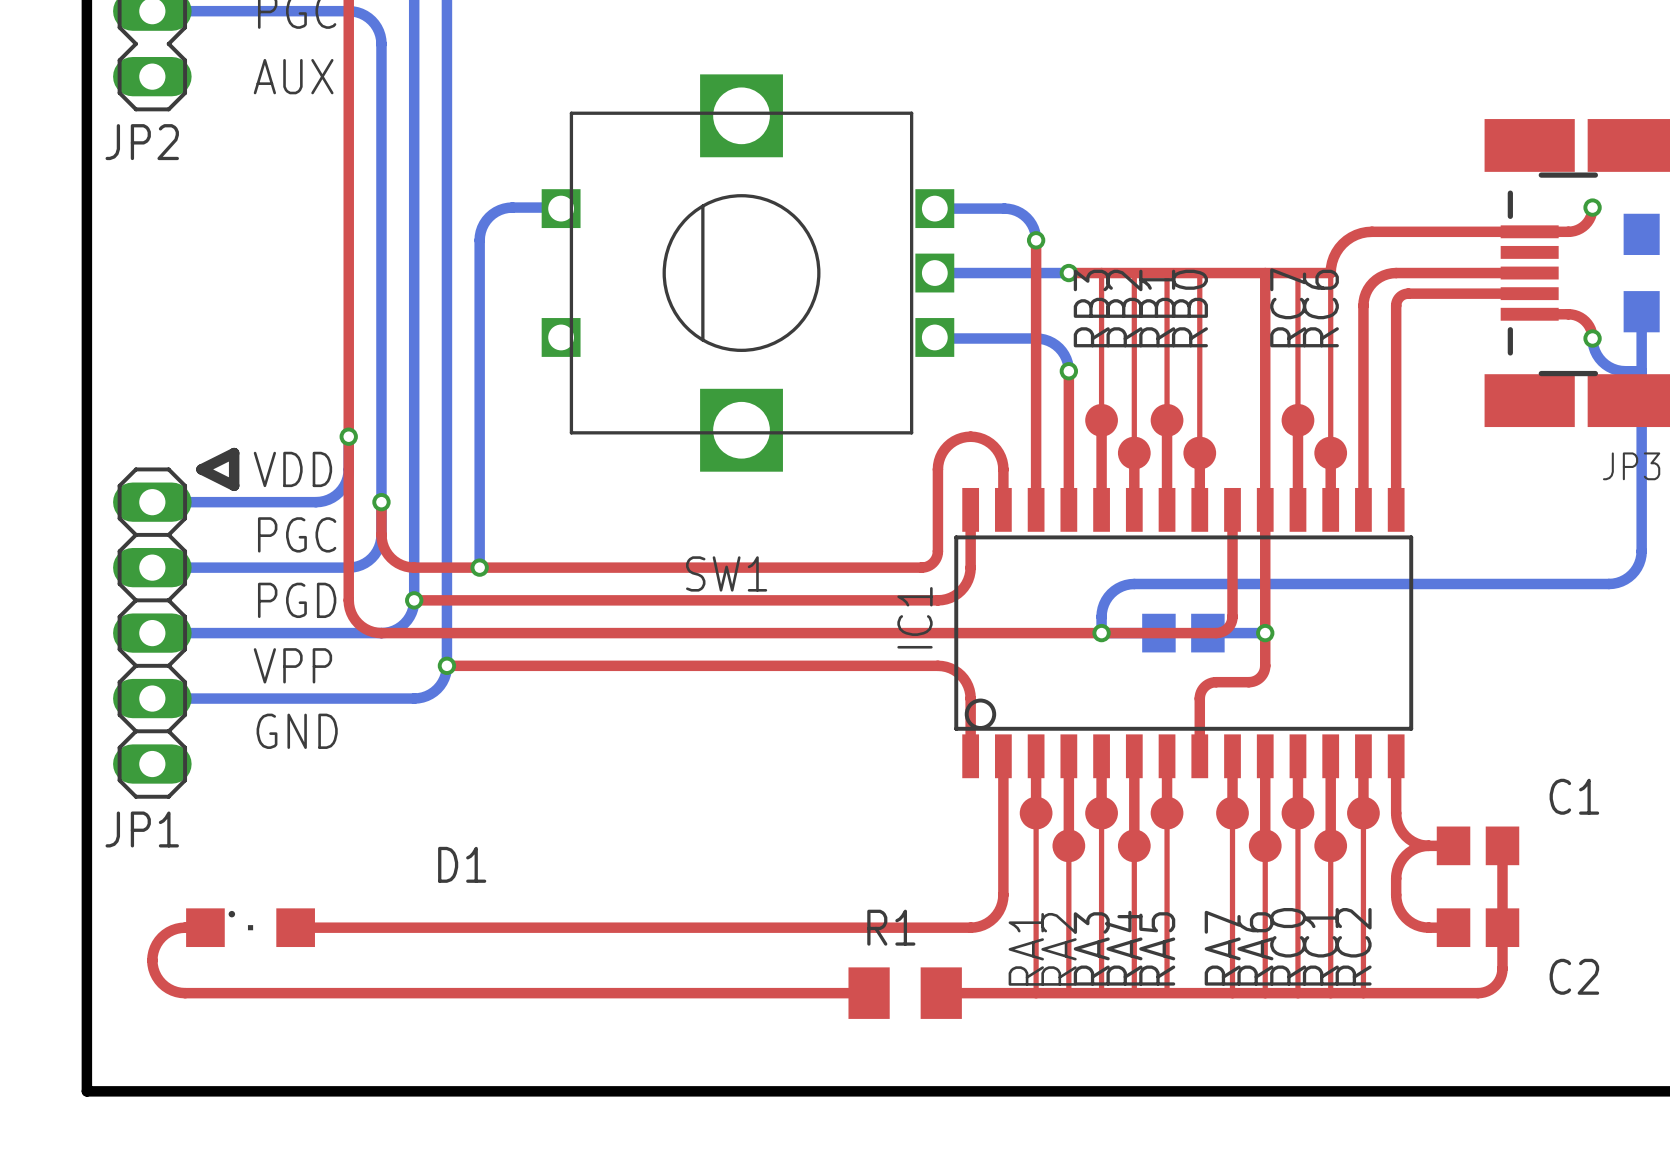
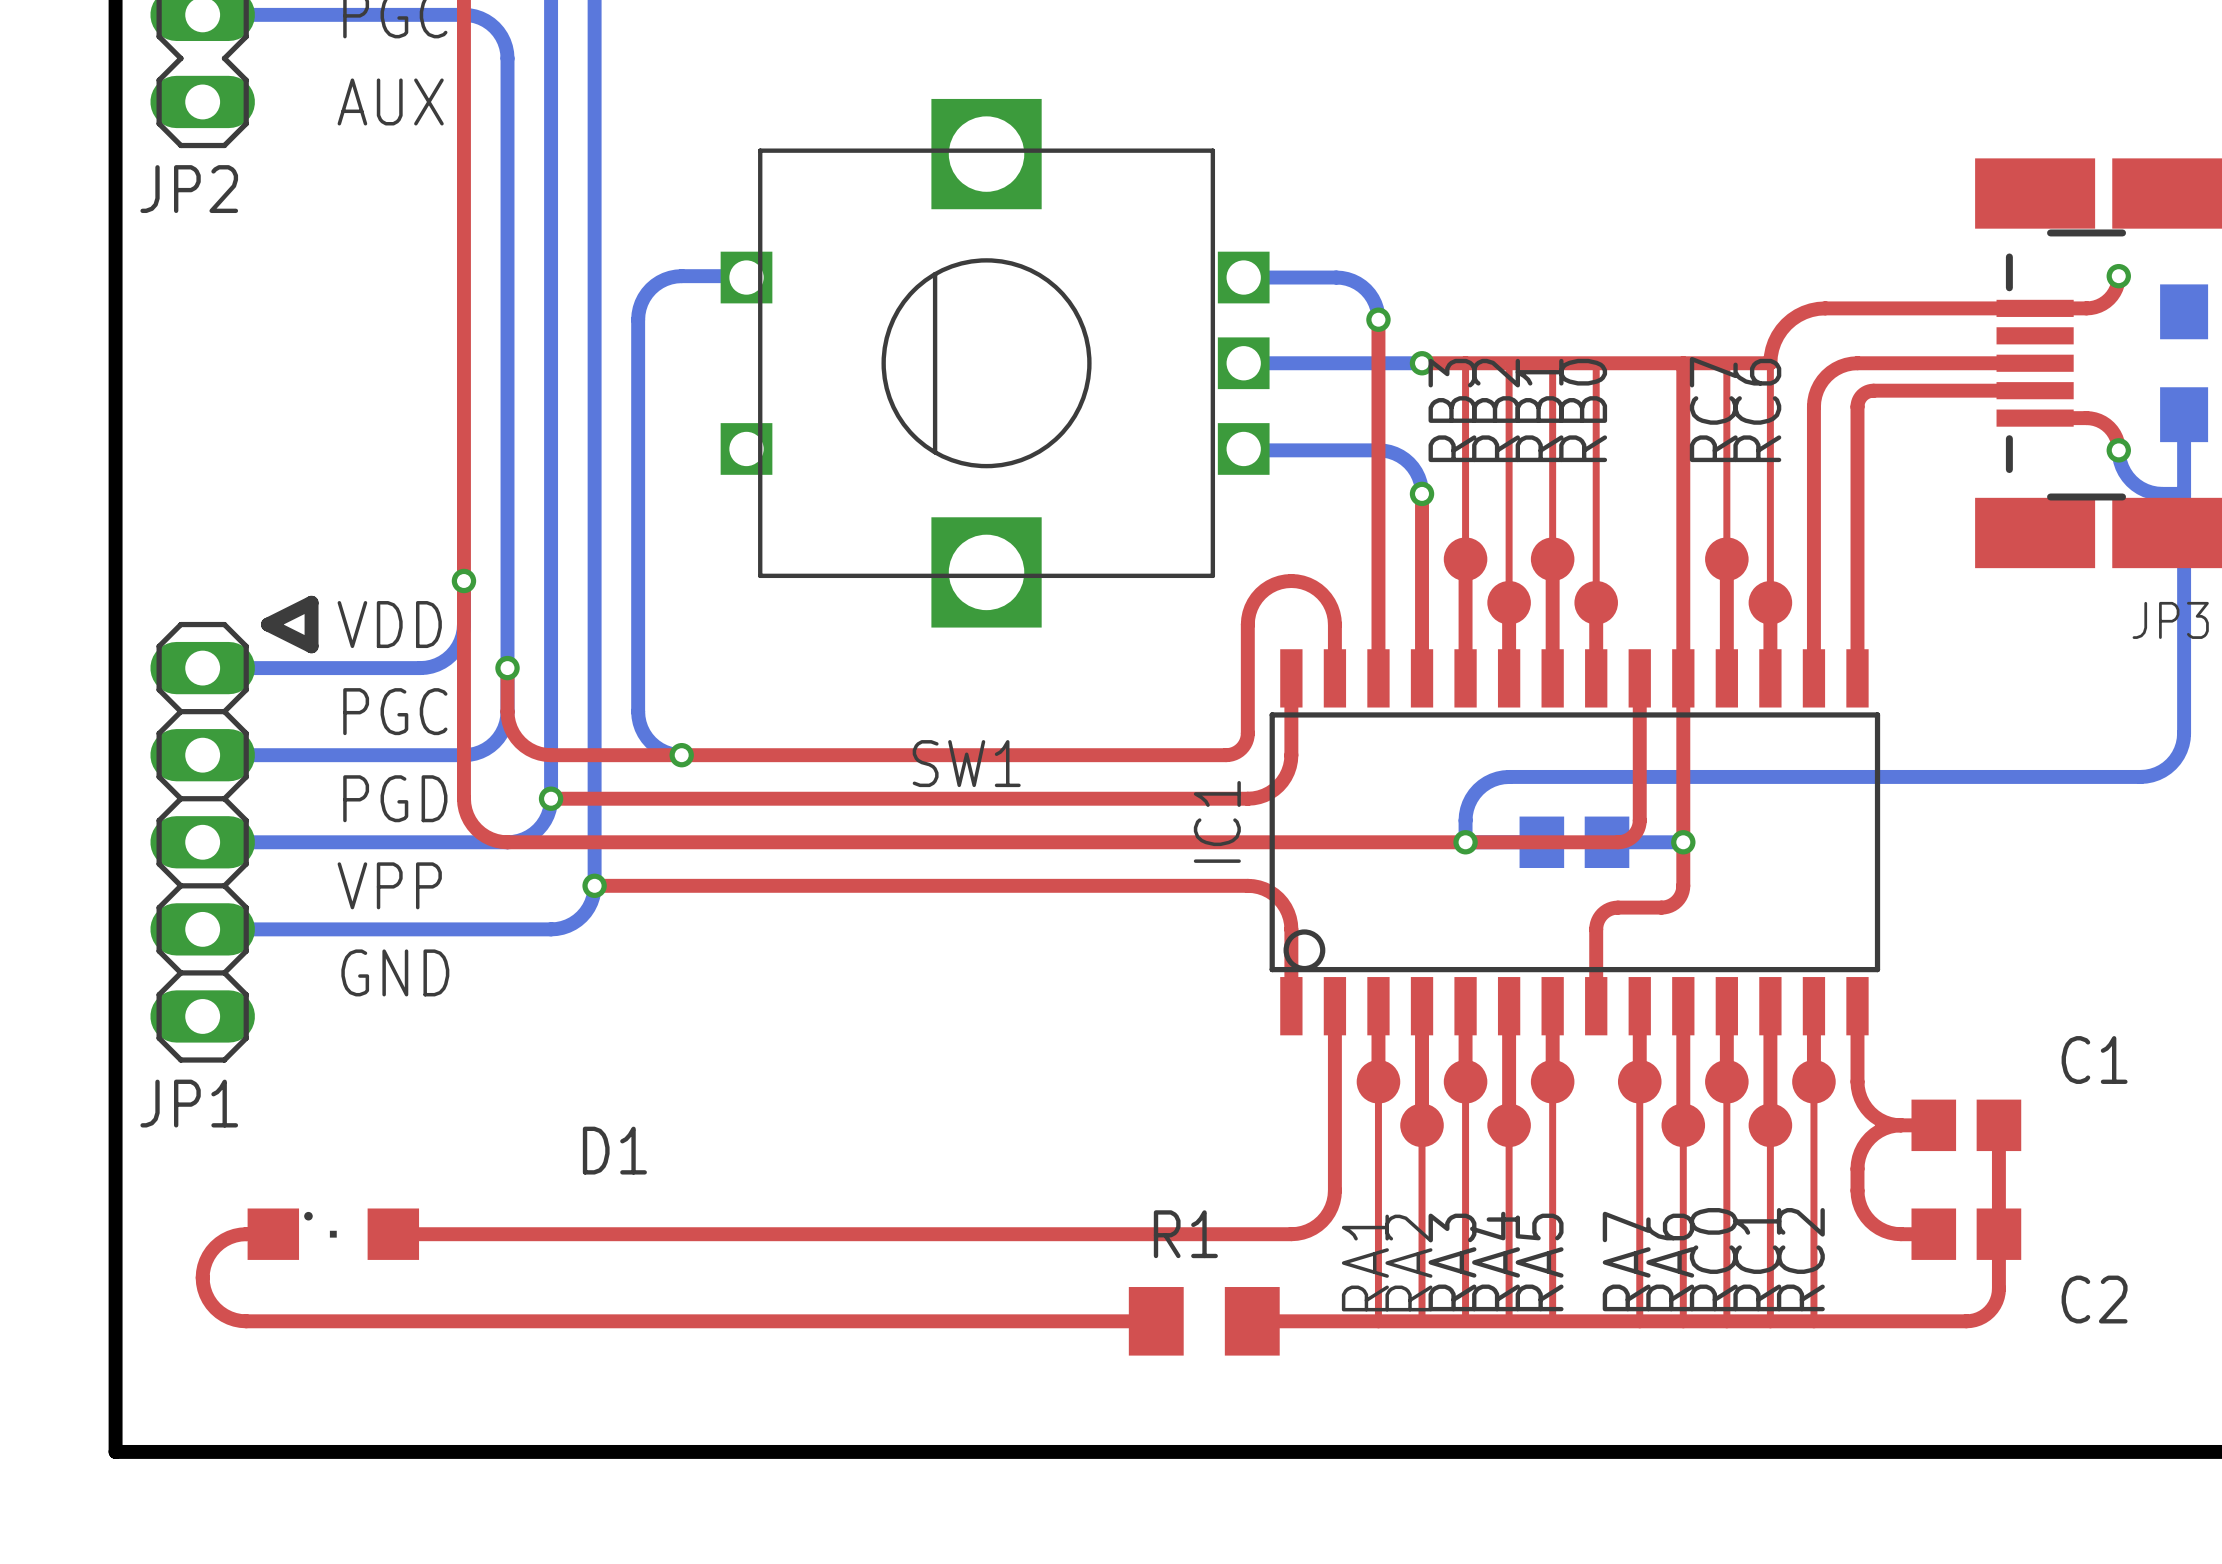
bottom track: (479, 534) (479, 567) -> (638, 711) (641, 728) (650, 742) (665, 751) (681, 755)
via position: (479, 567) -> (681, 755)

